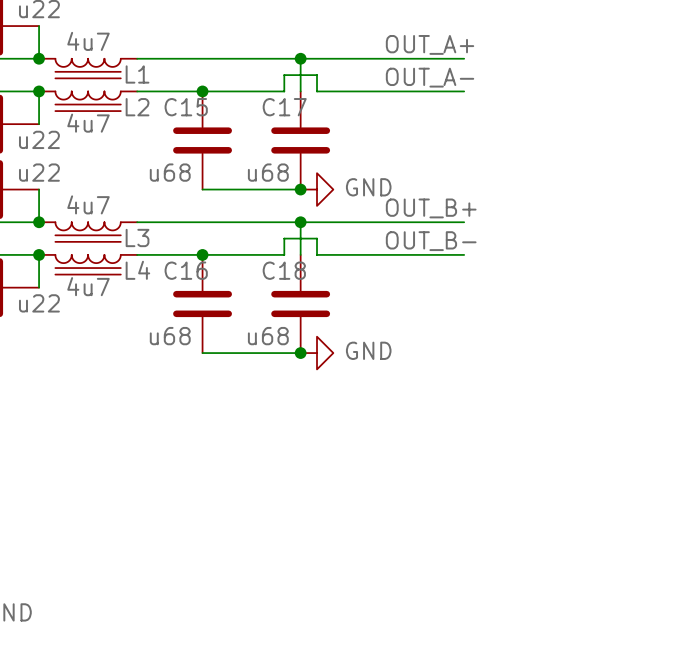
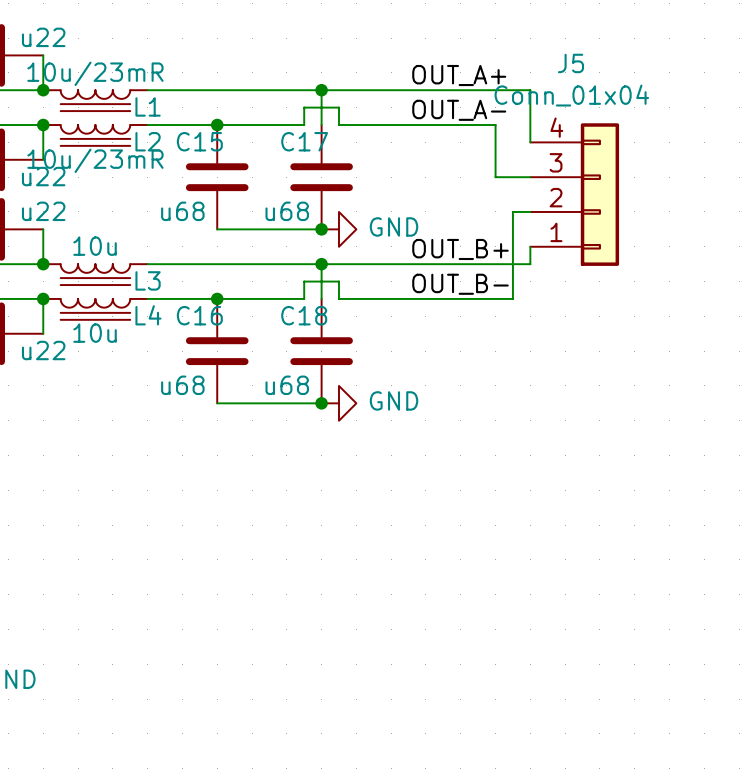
L1 value: 4u7 (88, 41) -> 10u/23mR (95, 73)
wire: none -> (495, 90) (530, 90) (530, 142)
wire: none -> (495, 125) (495, 177) (530, 177)
L2 value: 4u7 (88, 123) -> 10u/23mR (95, 160)
J5: none -> Conn_01x04 (574, 194)
wire: none -> (530, 211) (512, 211) (512, 298) (495, 298)
L3 value: 4u7 (88, 204) -> 10u (95, 246)
wire: none -> (530, 246) (530, 264) (495, 264)
L4 value: 4u7 (88, 286) -> 10u (95, 333)

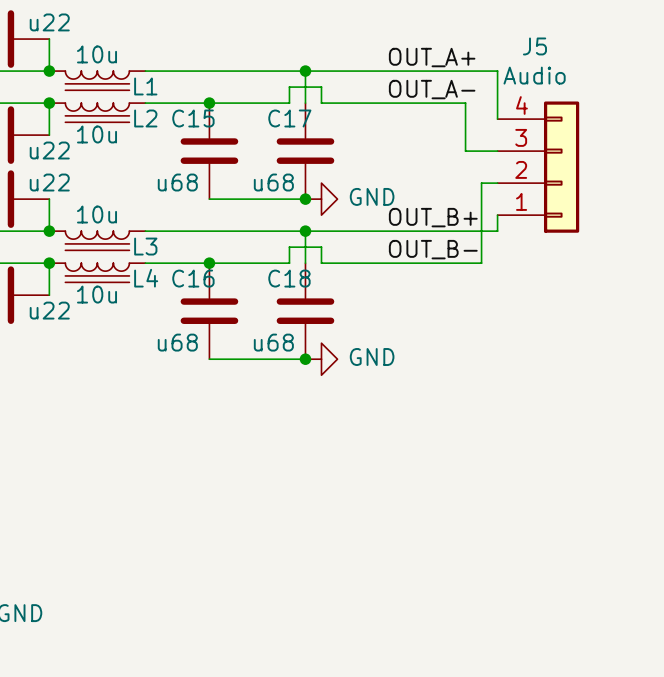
L1 value: 10u/23mR (95, 73) -> 10u (97, 54)
J5 value: Conn_01x04 (571, 95) -> Audio (534, 75)
L2 value: 10u/23mR (95, 160) -> 10u (97, 134)

